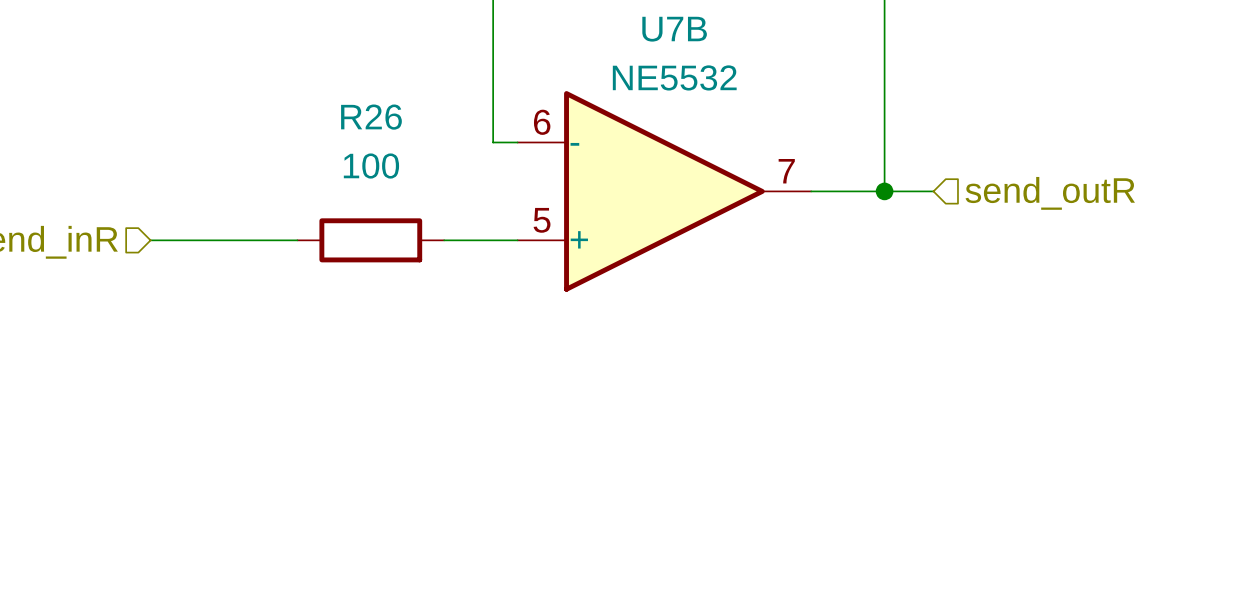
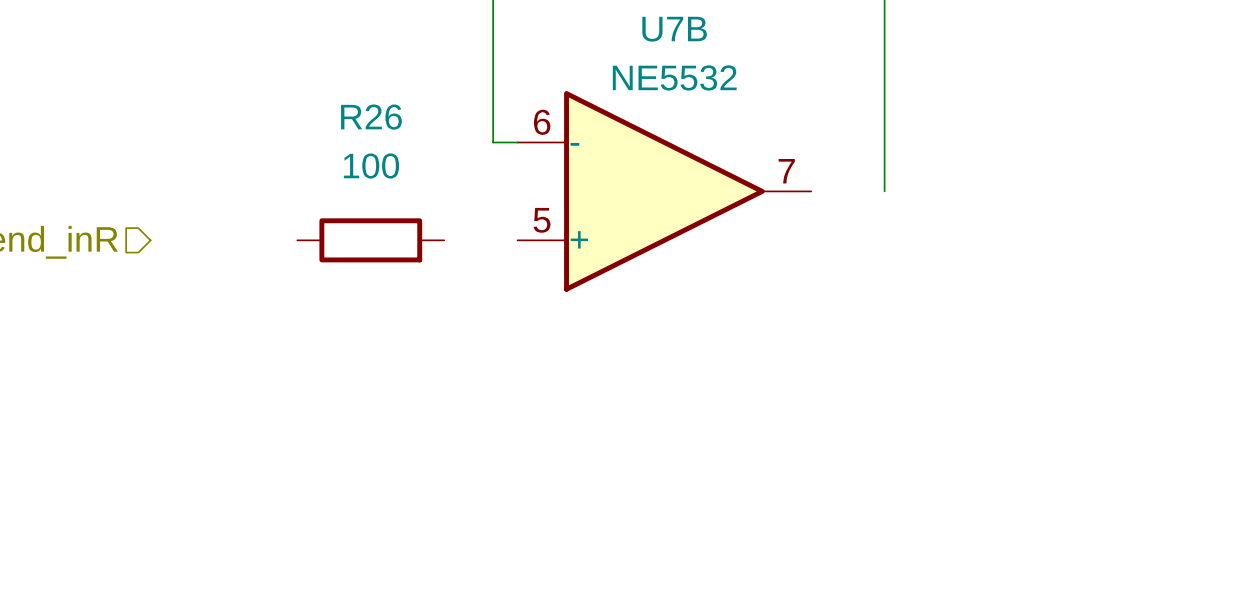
wire: (811, 191) (933, 191) -> none
junction: (884, 191) -> none
hierarchical label: send_outR (1050, 193) -> none
wire: (150, 240) (297, 240) -> none
wire: (444, 240) (517, 240) -> none

